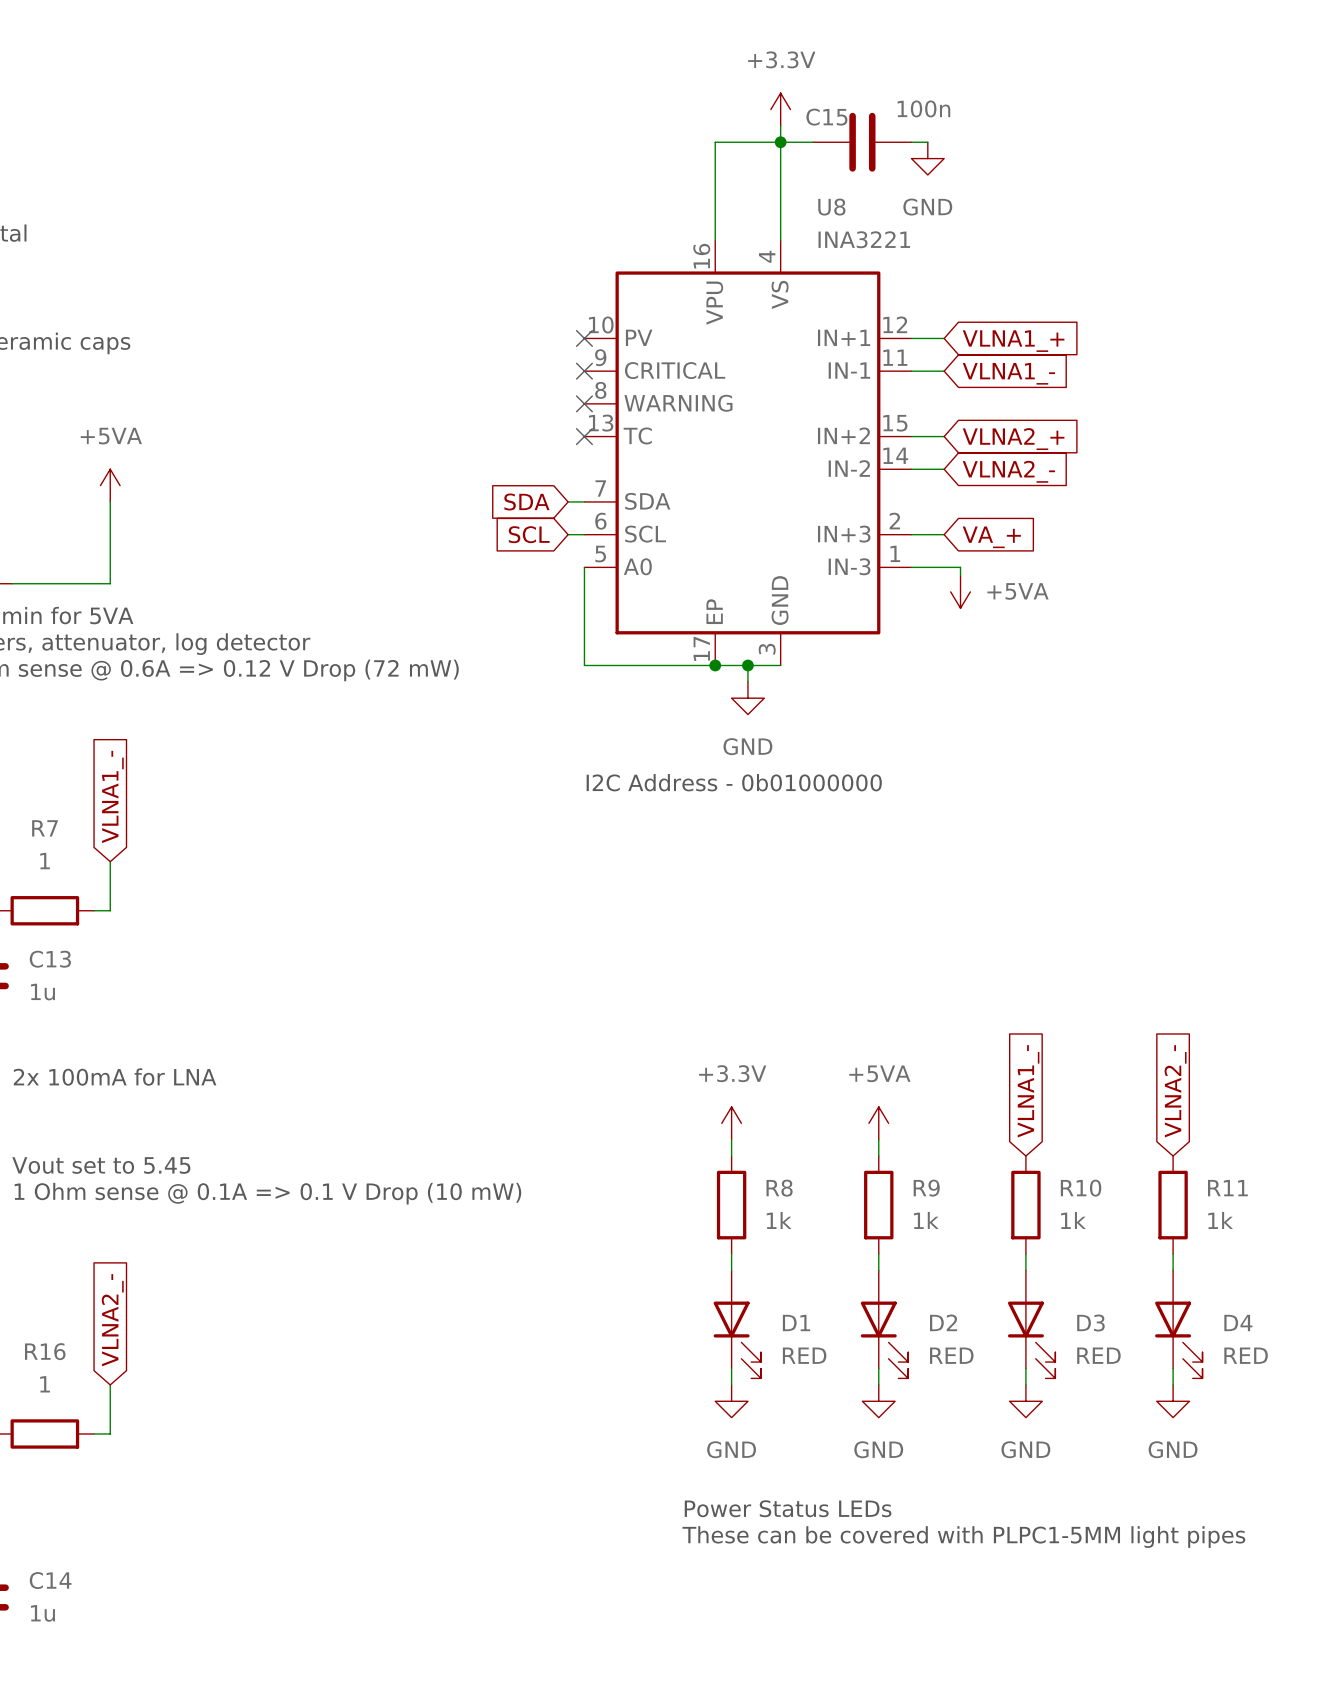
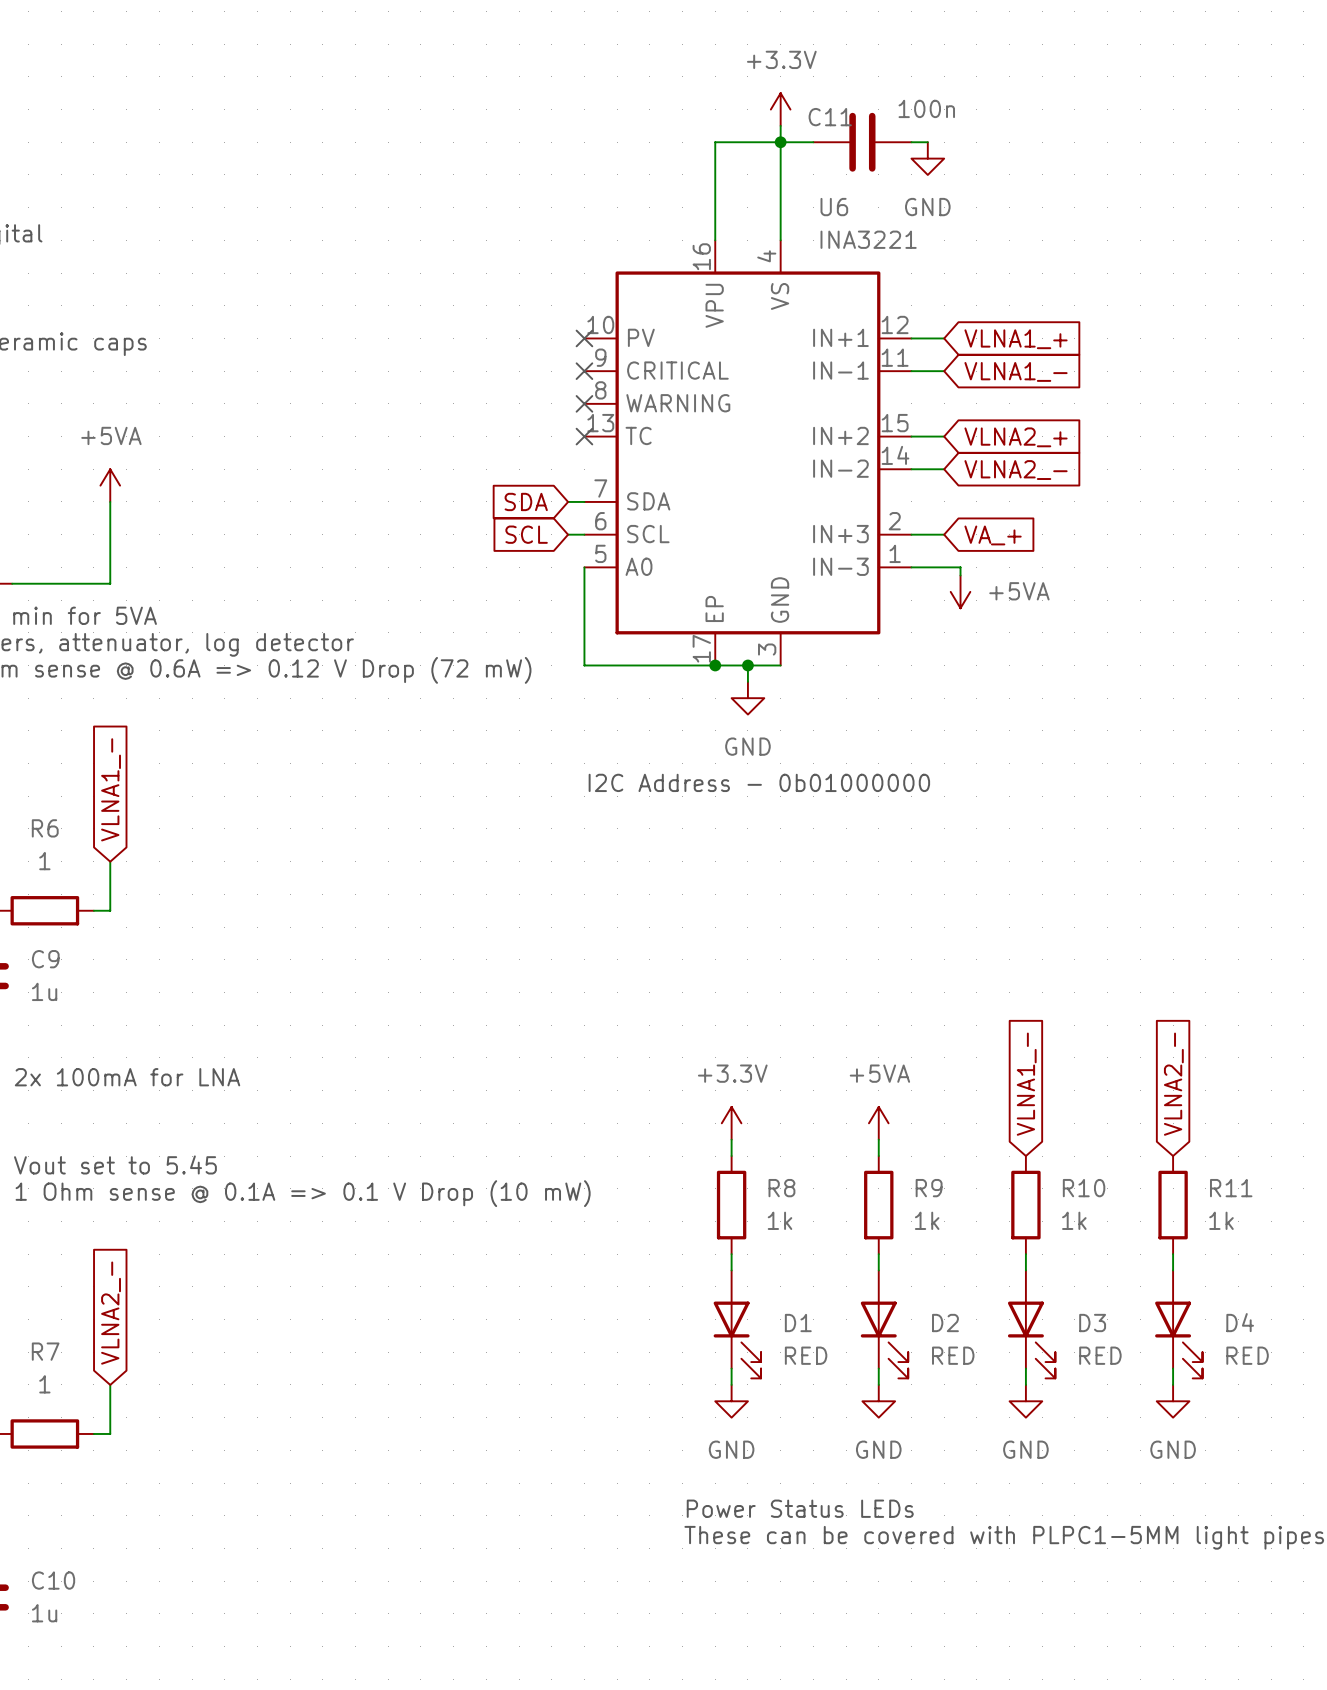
C15 name: C15 (826, 117) -> C11 (830, 117)
U8 name: U8 (831, 207) -> U6 (834, 207)
R7 name: R7 (45, 828) -> R6 (45, 828)
C13 name: C13 (50, 959) -> C9 (45, 959)
R16 name: R16 (45, 1351) -> R7 (45, 1351)
C14 name: C14 (50, 1580) -> C10 (53, 1580)

